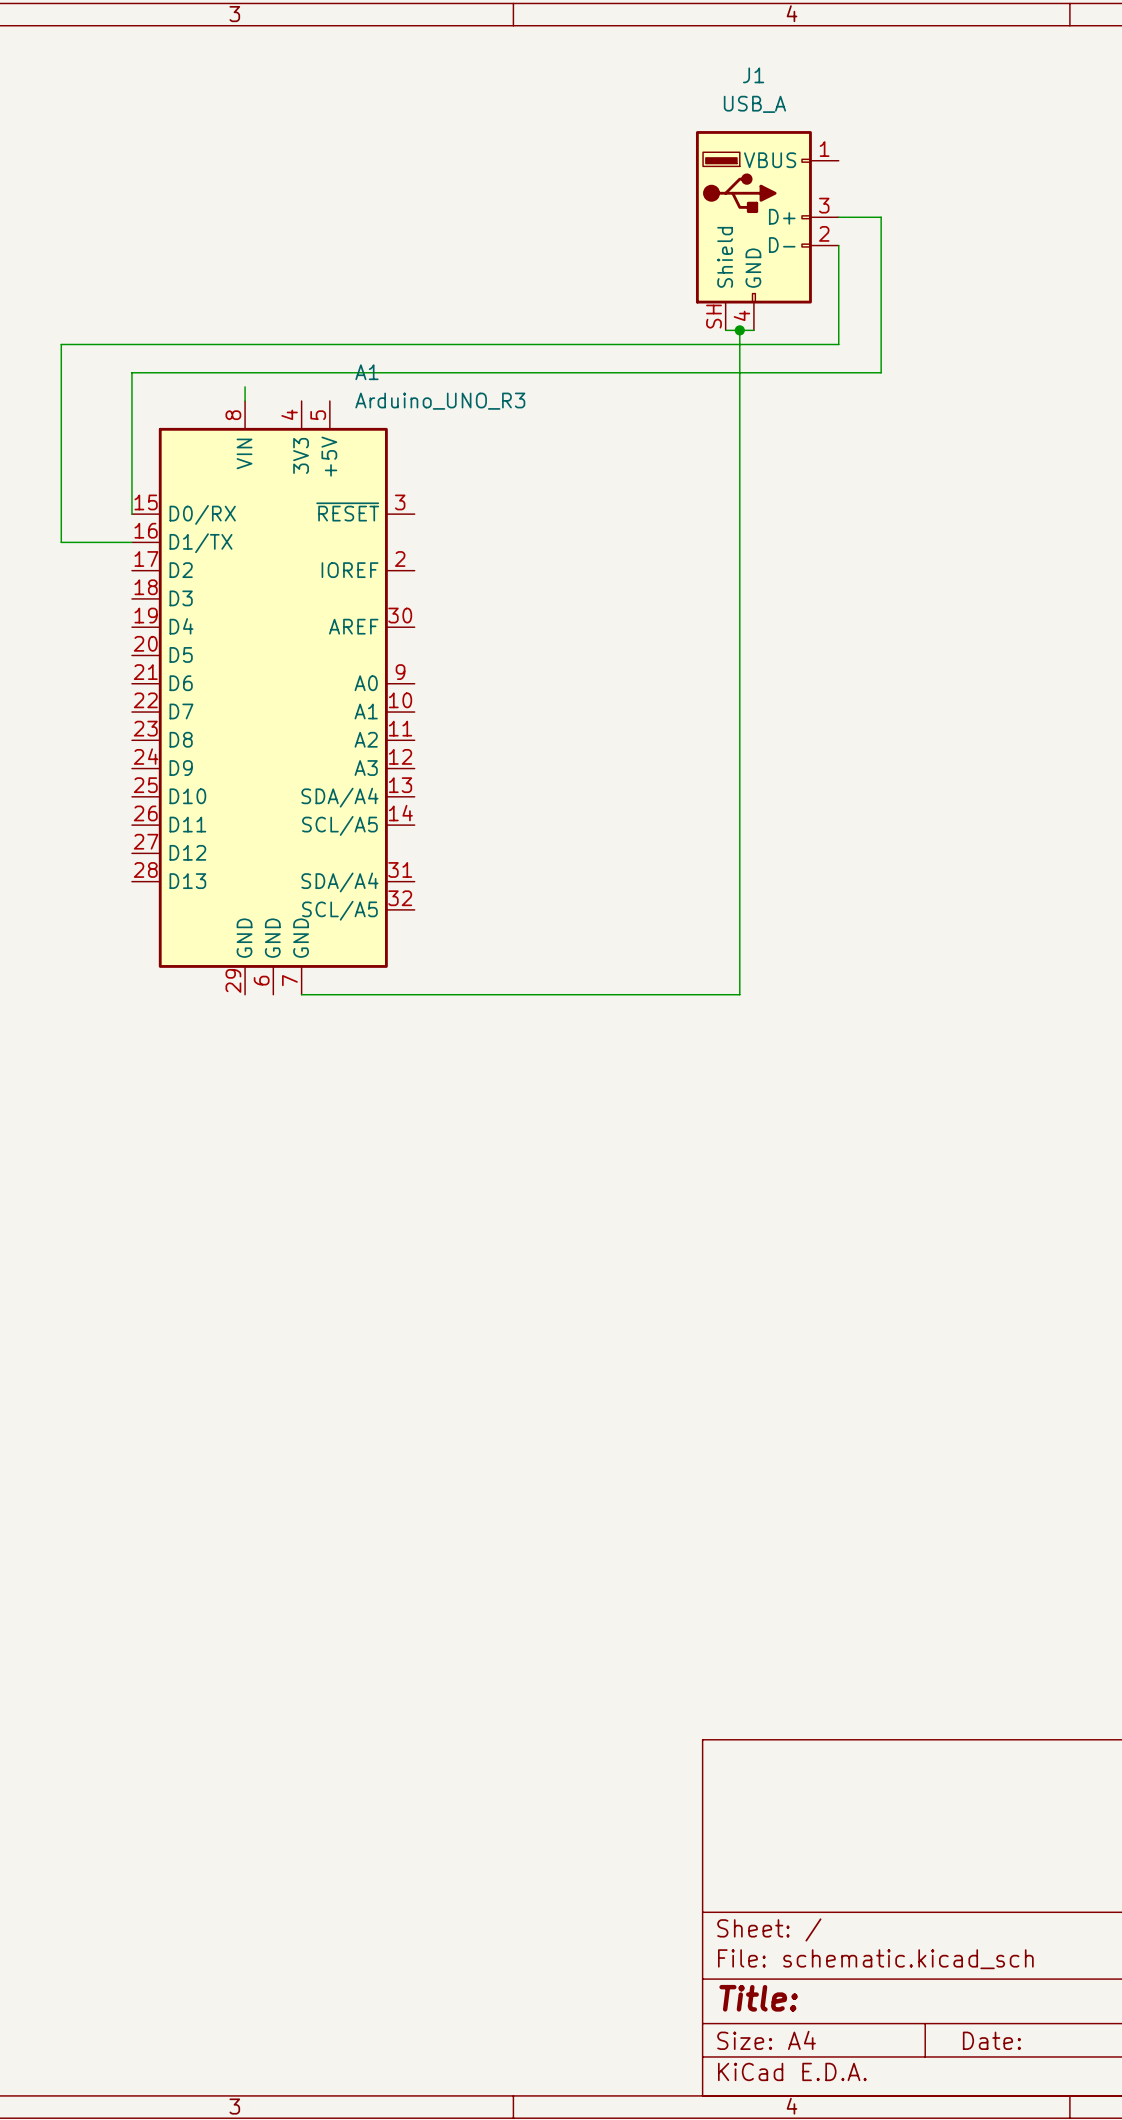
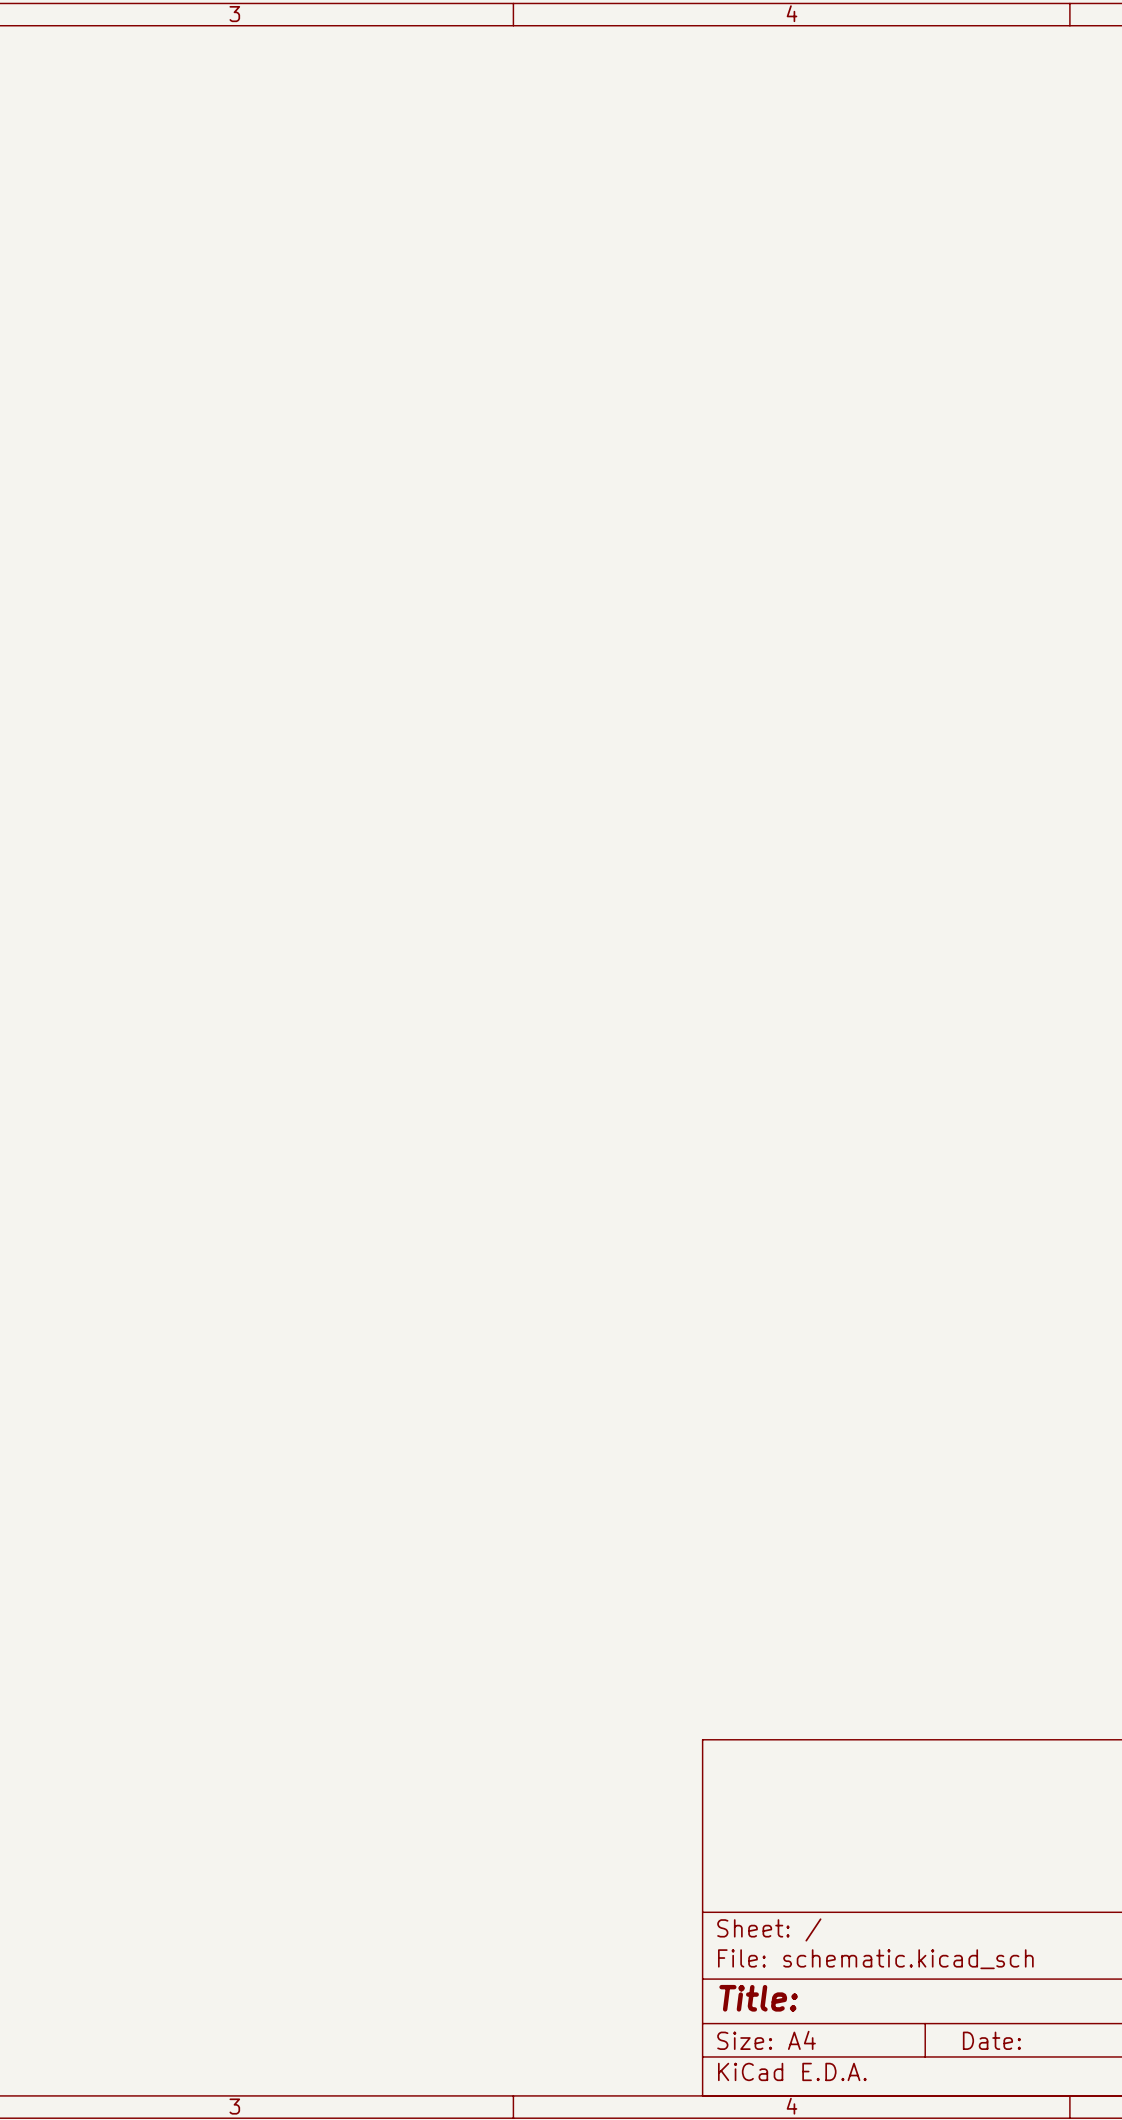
wire: (838, 217) (881, 217) (881, 372) (131, 372) (131, 514) -> none
J1: USB_A (767, 230) -> none
wire: (838, 245) (838, 344) (61, 344) (61, 542) (131, 542) -> none
wire: (725, 330) (753, 330) -> none
wire: (739, 330) (739, 994) (301, 994) -> none
junction: (739, 330) -> none
wire: (245, 386) (245, 401) -> none
A1: Arduino_UNO_R3 (273, 697) -> none

